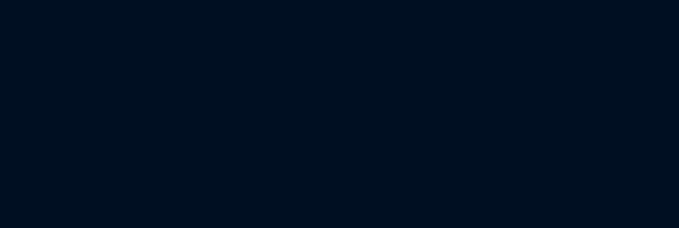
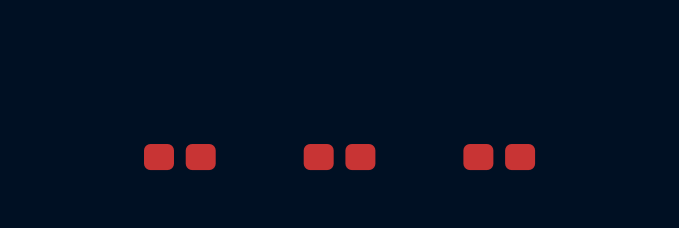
part: none -> (179, 157)
part: none -> (339, 157)
part: none -> (499, 157)

